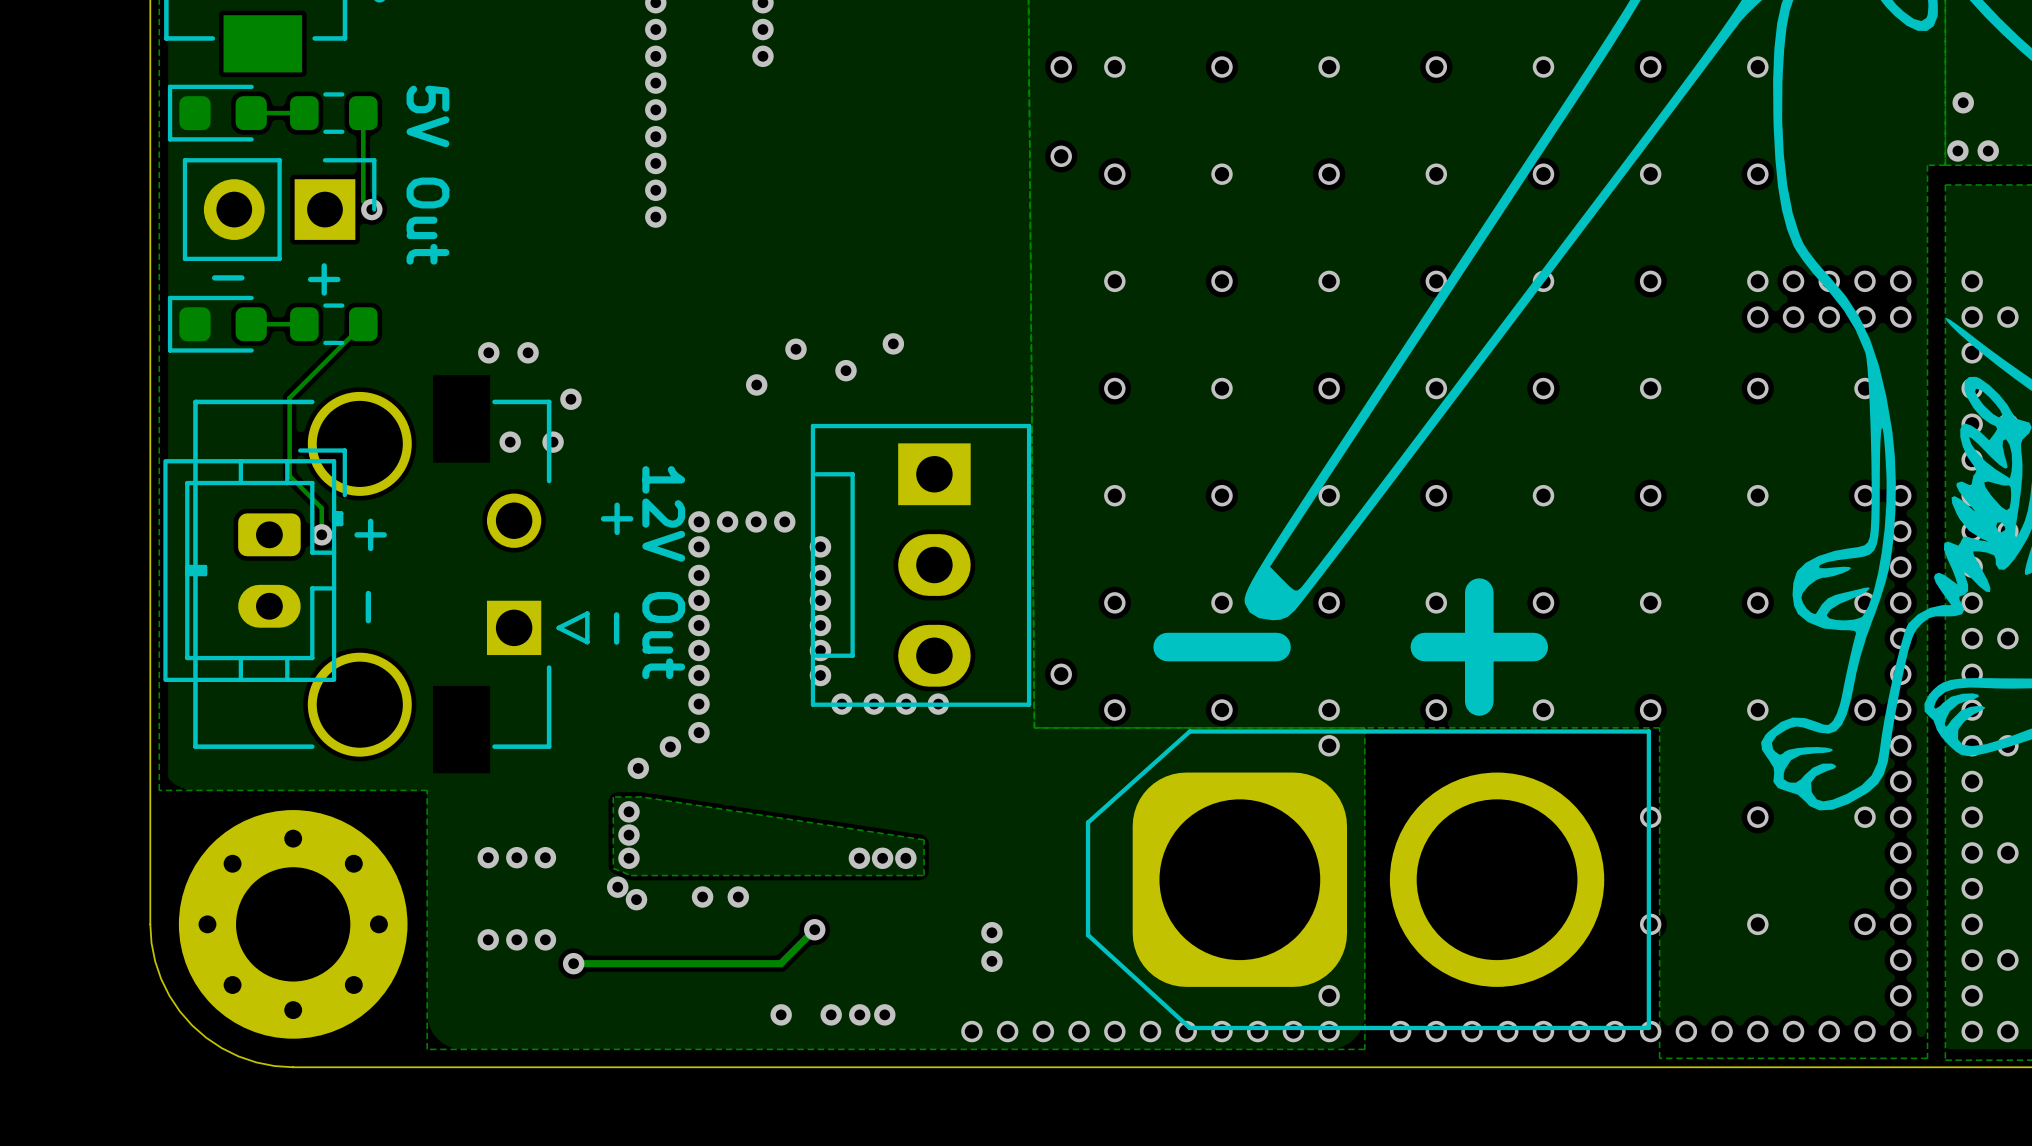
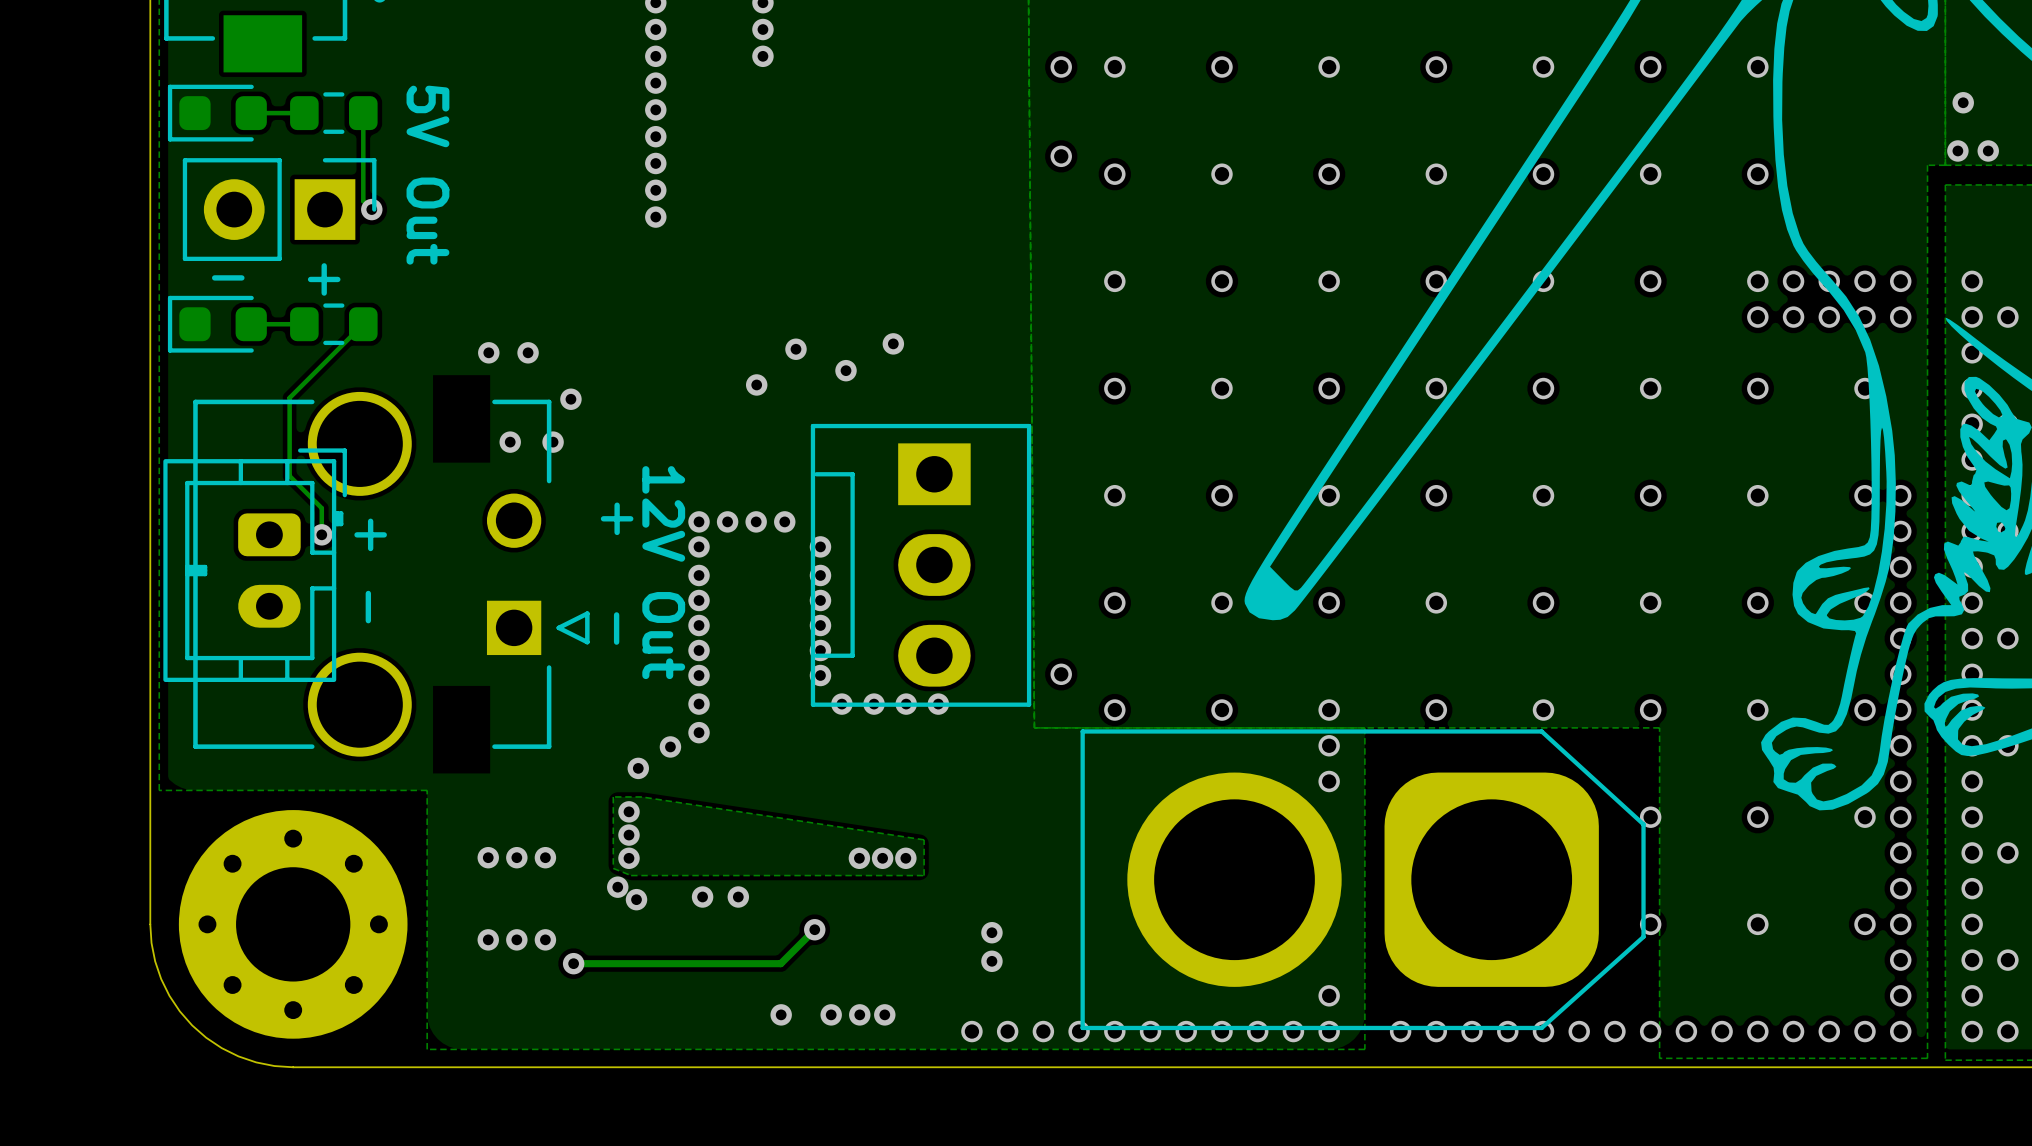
text: - (1222, 647) -> none
text: + (1479, 647) -> none
via: none -> (1329, 781)
part rotation: 0° (1368, 879) -> 180° (1363, 879)

